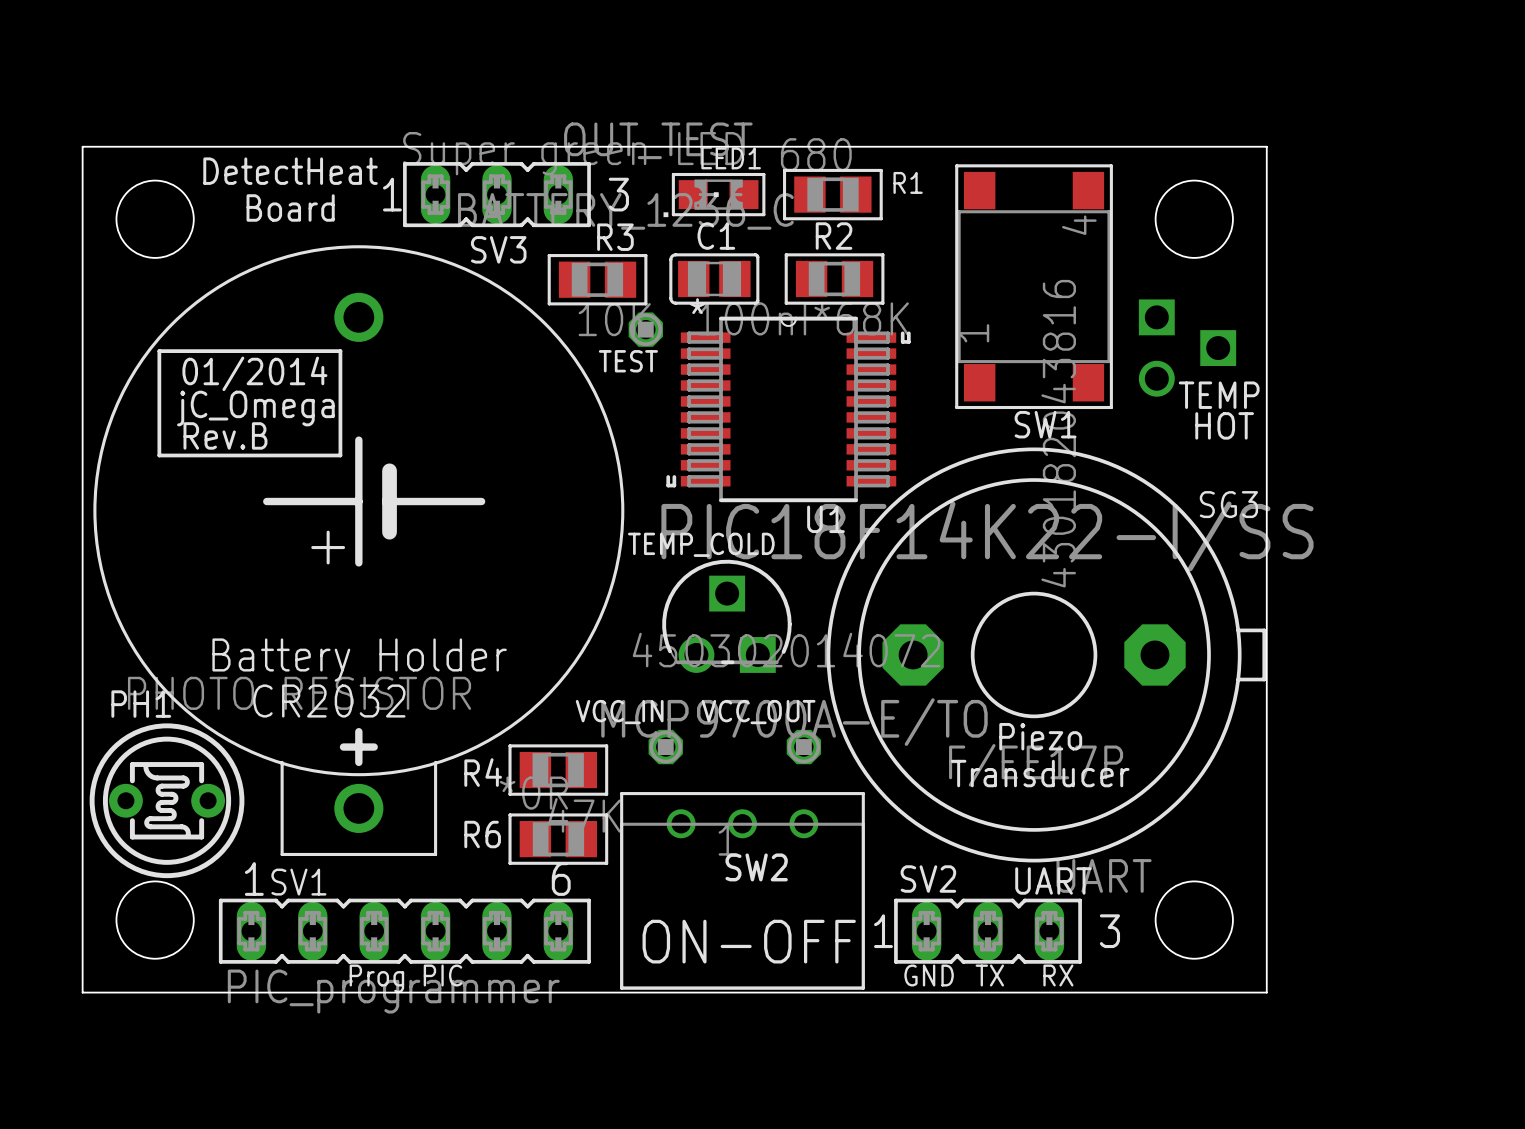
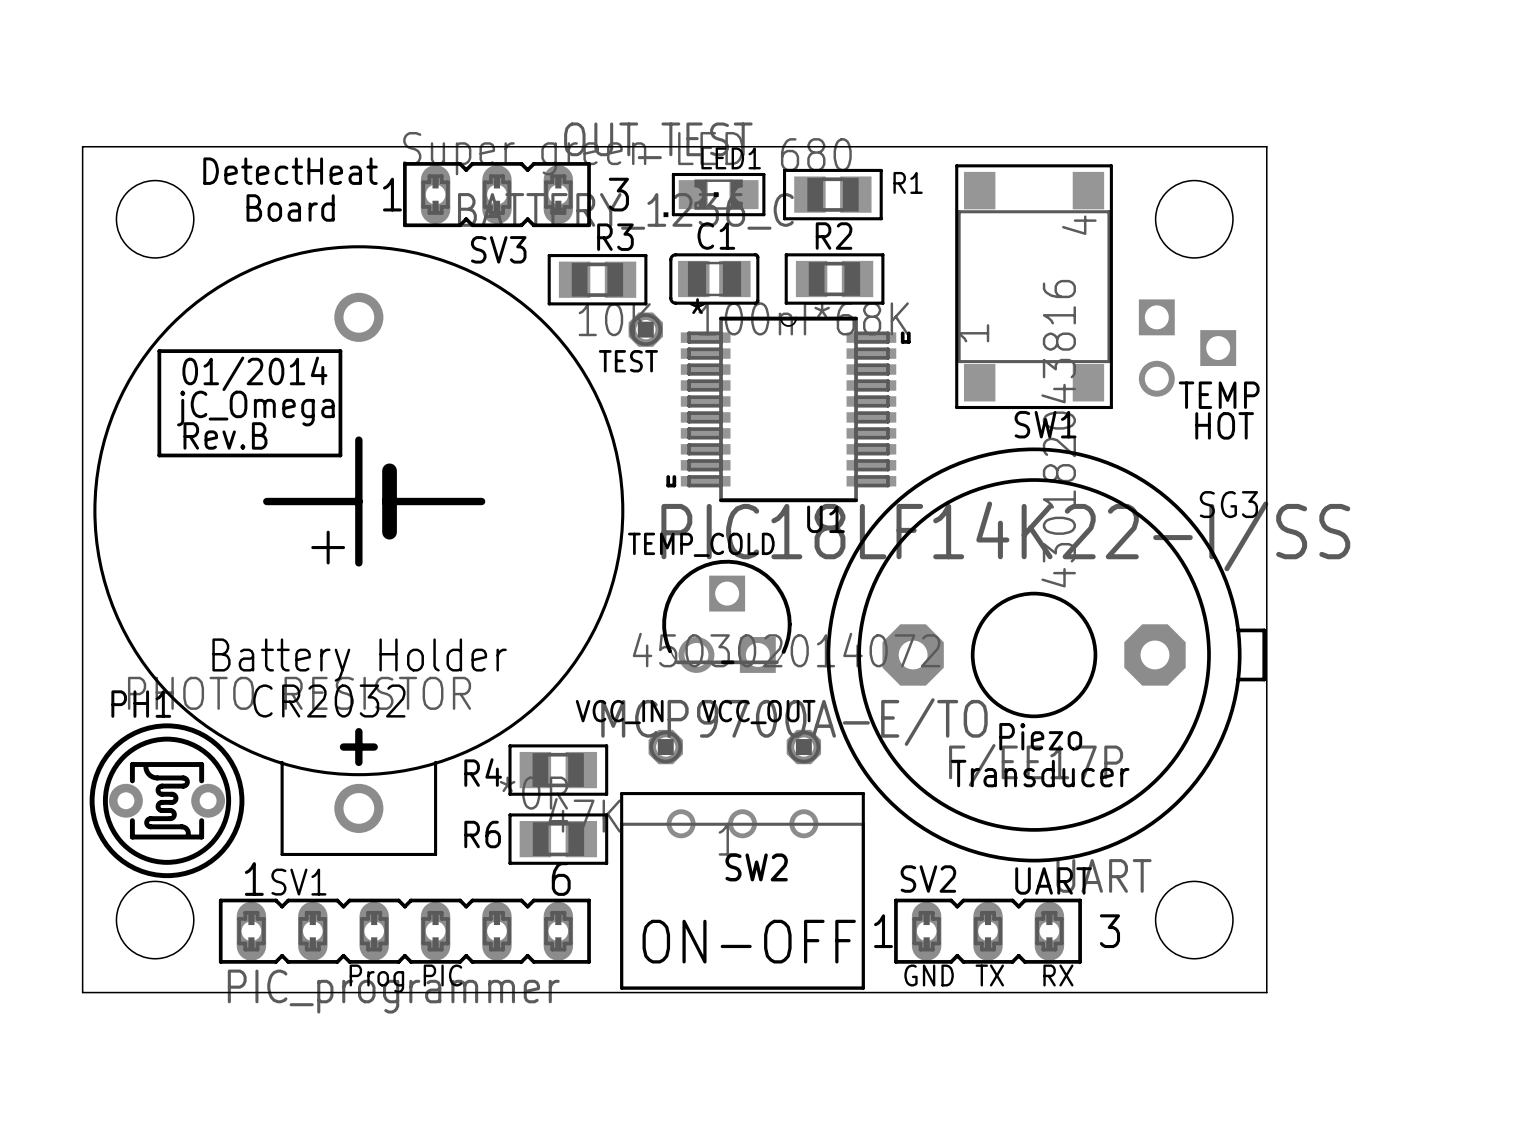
U1 value: PIC18F14K22-I/SS (987, 536) -> PIC18LF14K22-I/SS (1005, 536)

